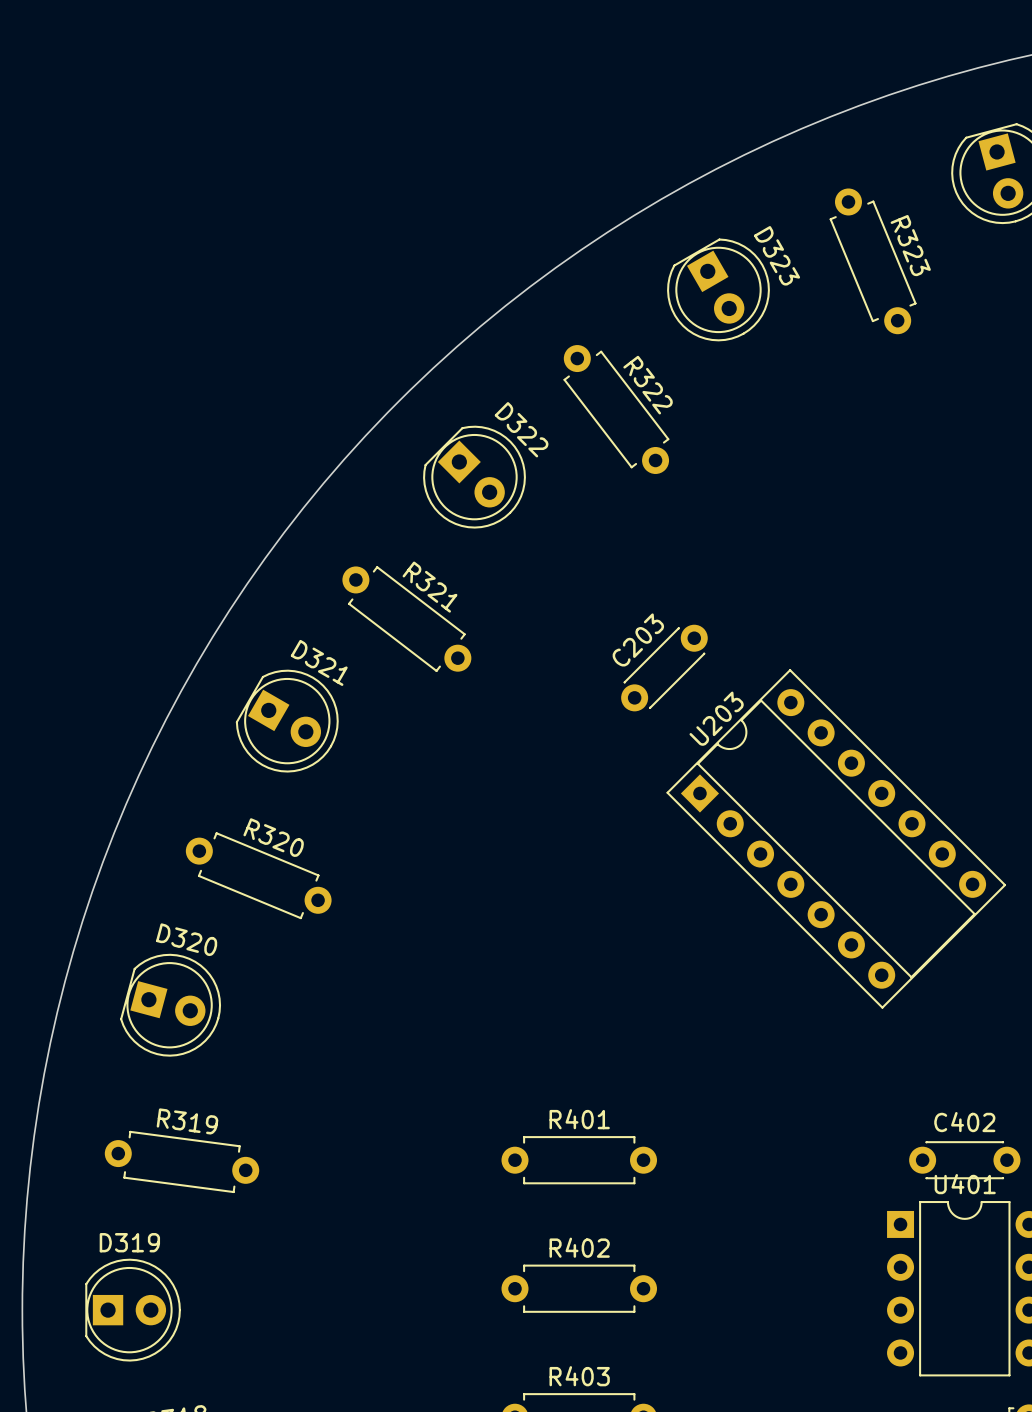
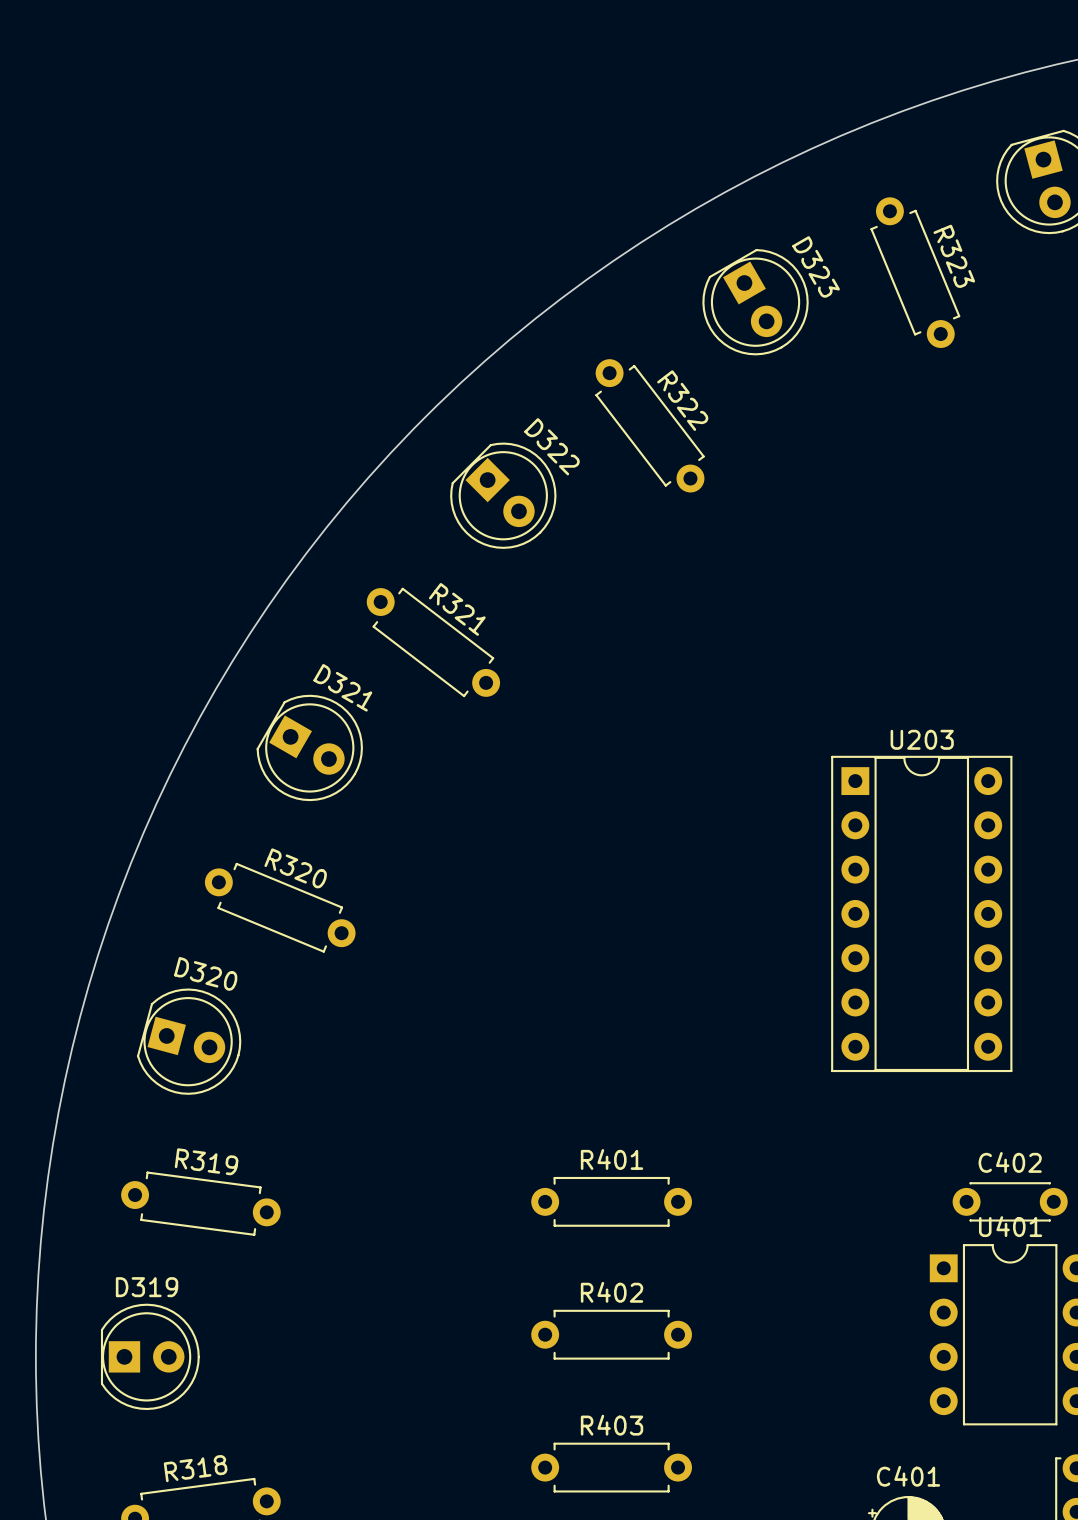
C203: (664, 668) -> none
U203 footprint: [666, 669, 1007, 1009] -> [831, 755, 1013, 1073]
U203 name position: U203 (716, 718) -> U203 (922, 739)

